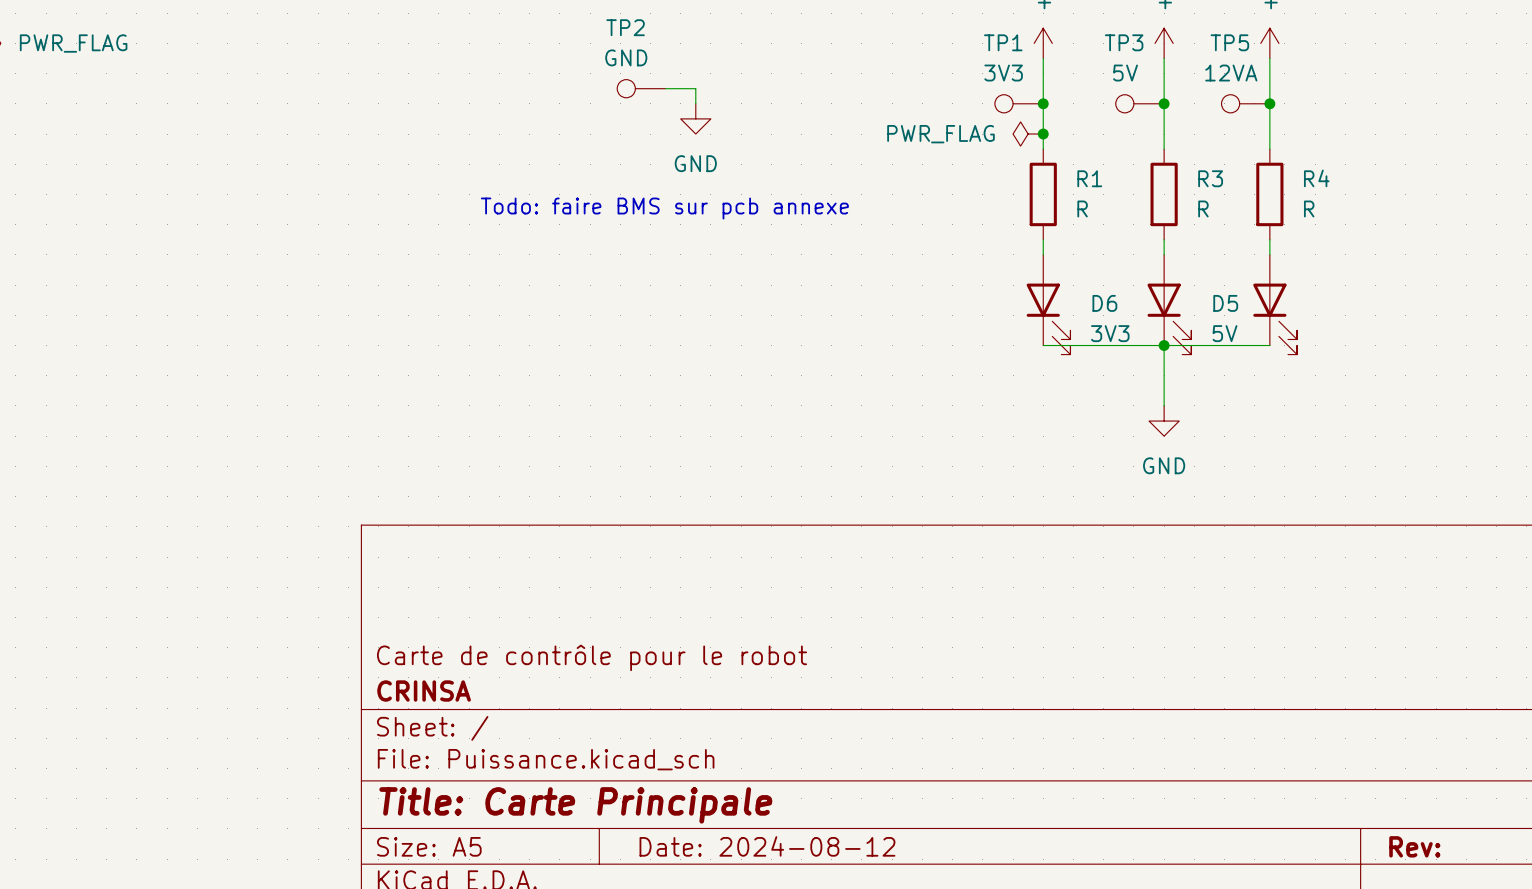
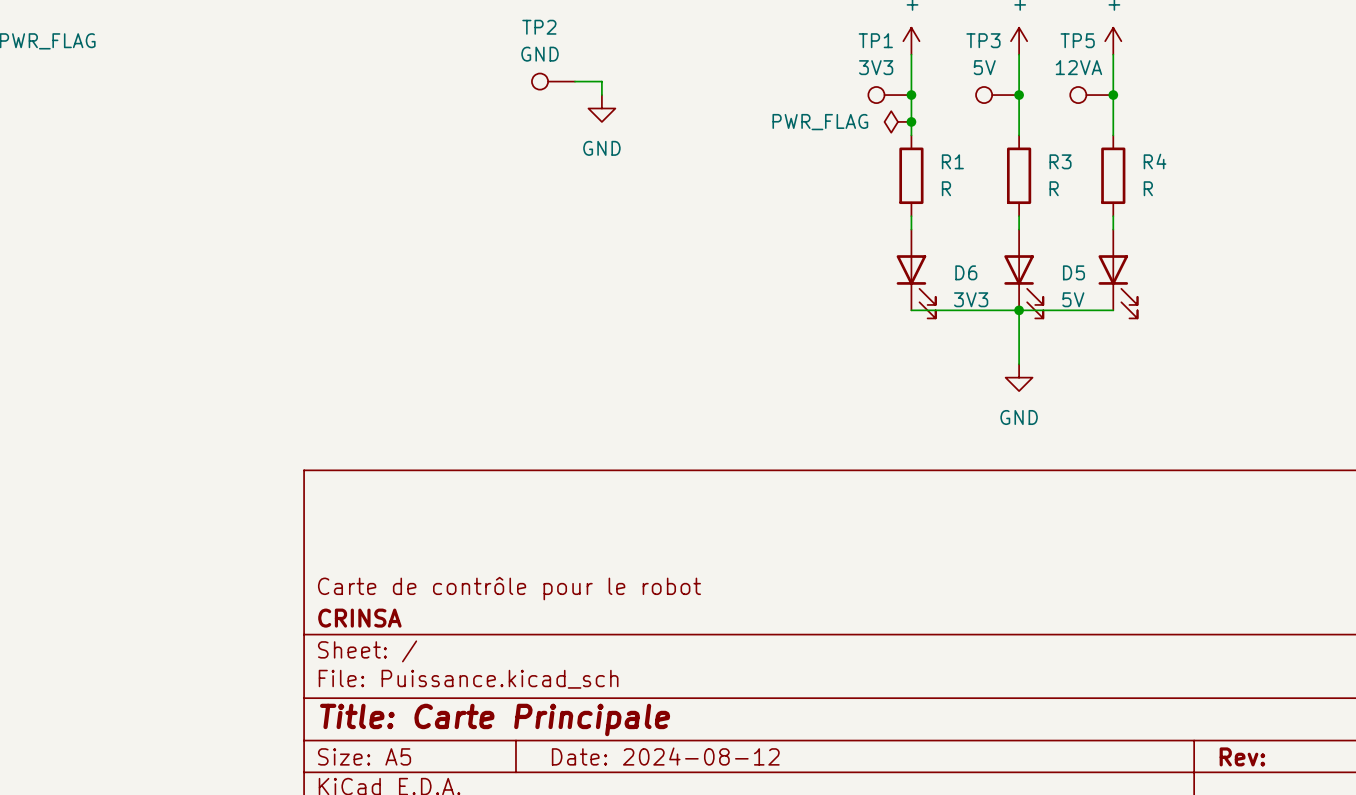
text: Todo: faire BMS sur pcb annexe (664, 208) -> none

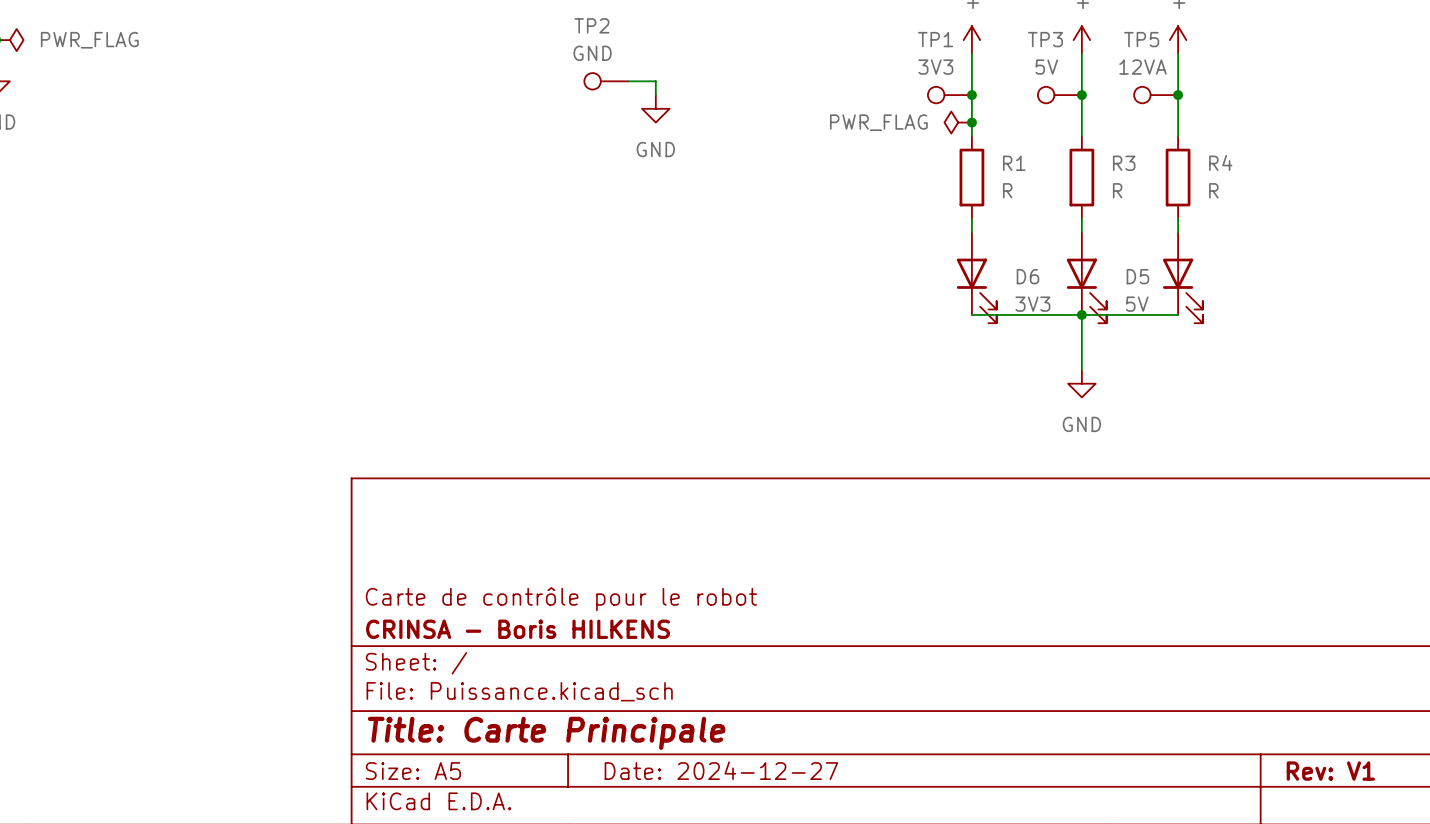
title block: CRINSA (359, 618) -> CRINSA - Boris HILKENS (518, 629)
title block: Date: 2024-08-12 (665, 756) -> Date: 2024-12-27 (721, 770)
title block: Rev: (1242, 756) -> Rev: V1 (1330, 771)

